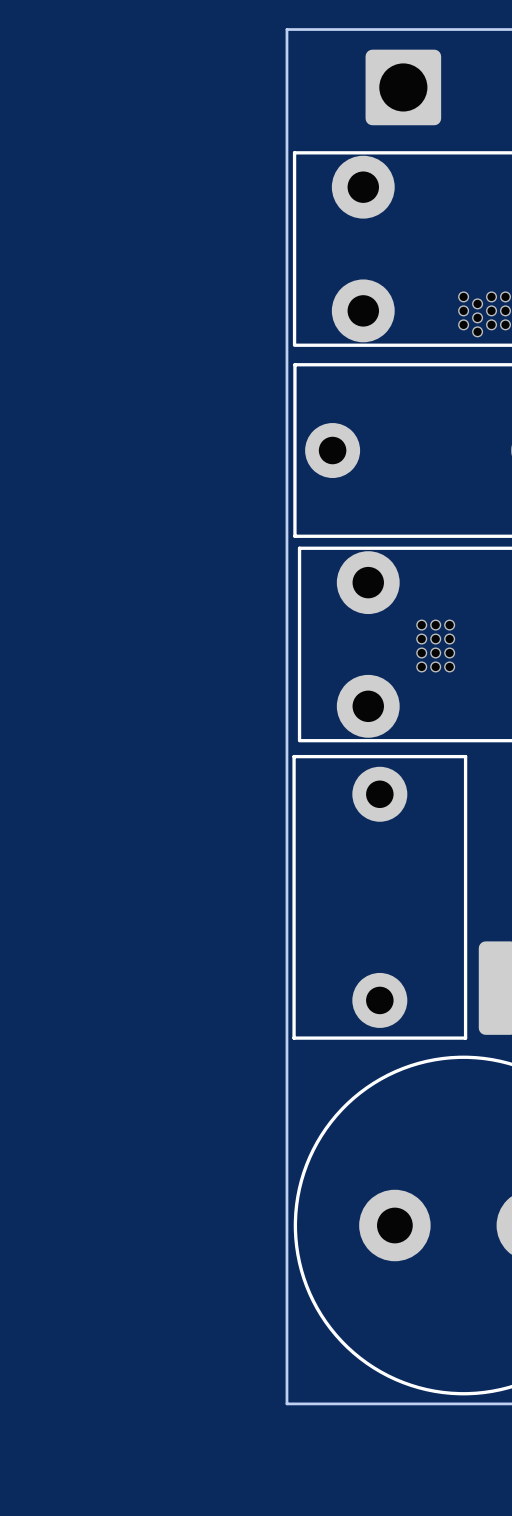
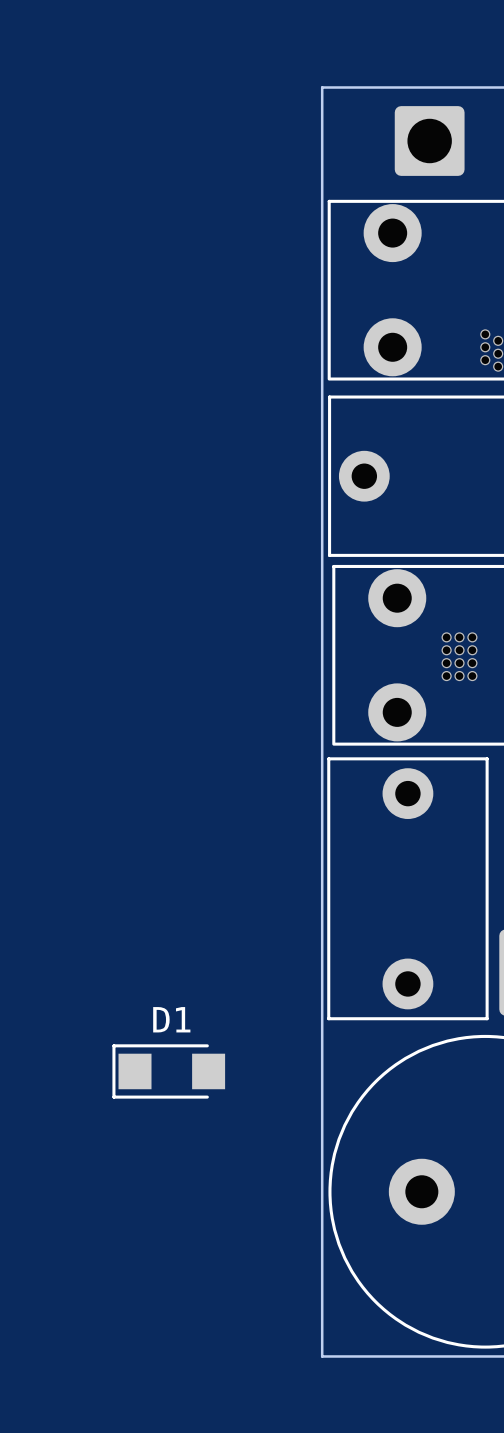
D1: none -> (168, 1071)

